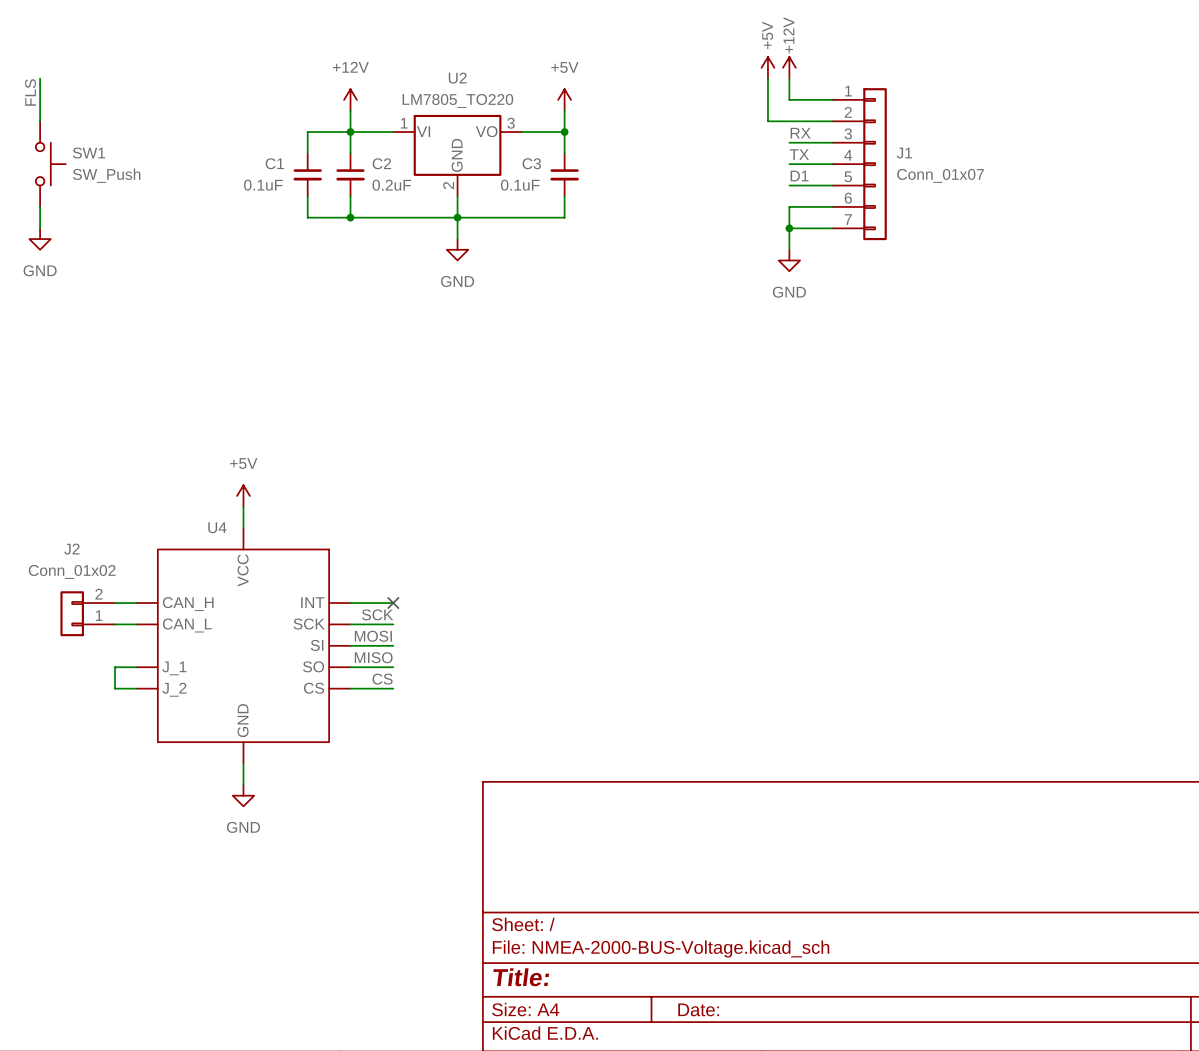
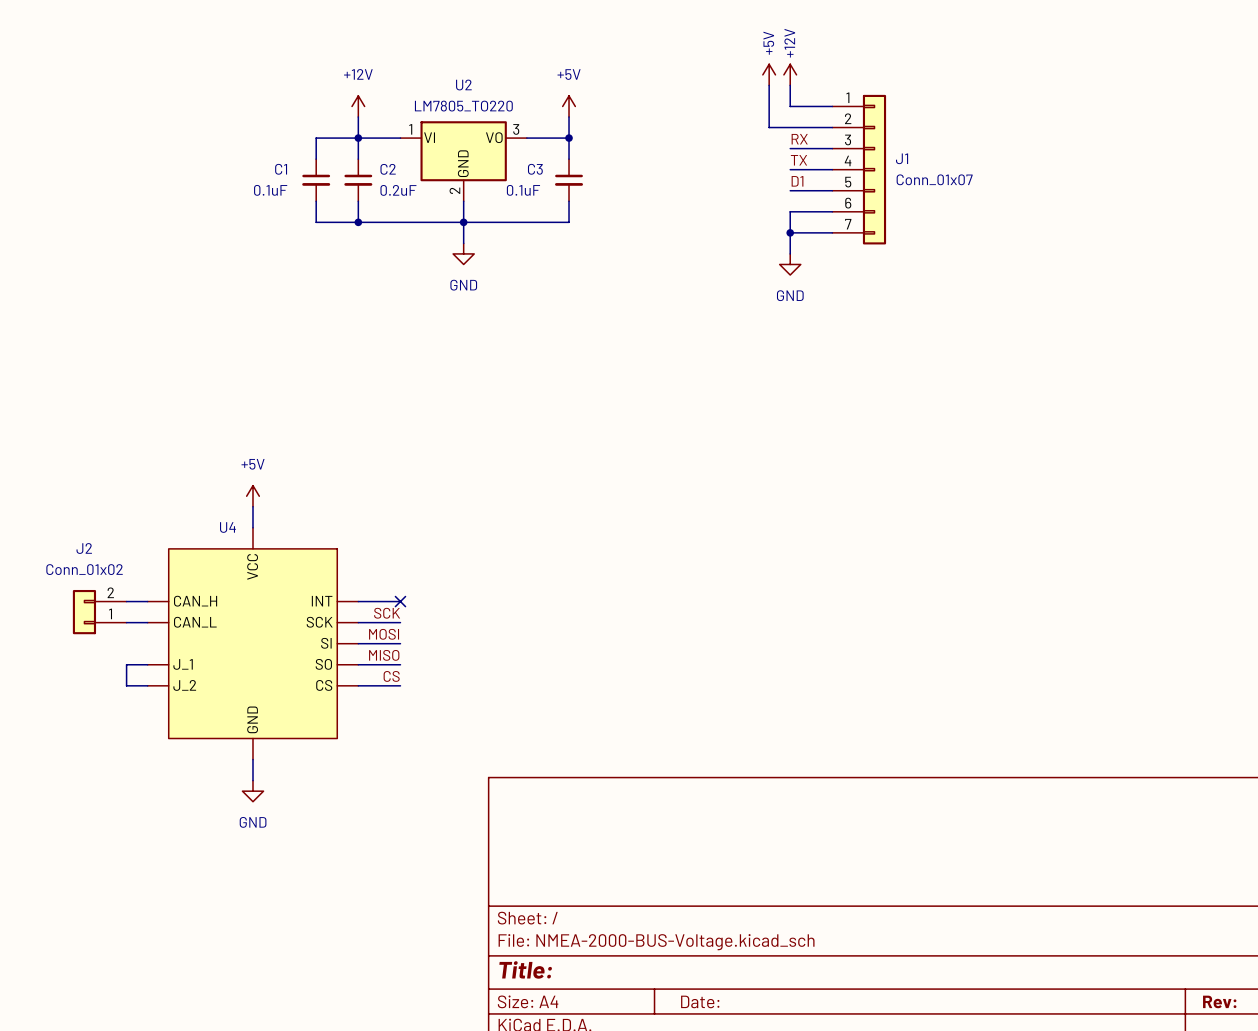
wire: (40, 78) (40, 121) -> none
label: FLS (30, 92) -> none
SW1: SW_Push (50, 164) -> none
wire: (40, 206) (40, 228) -> none
power symbol: GND (40, 239) -> none

